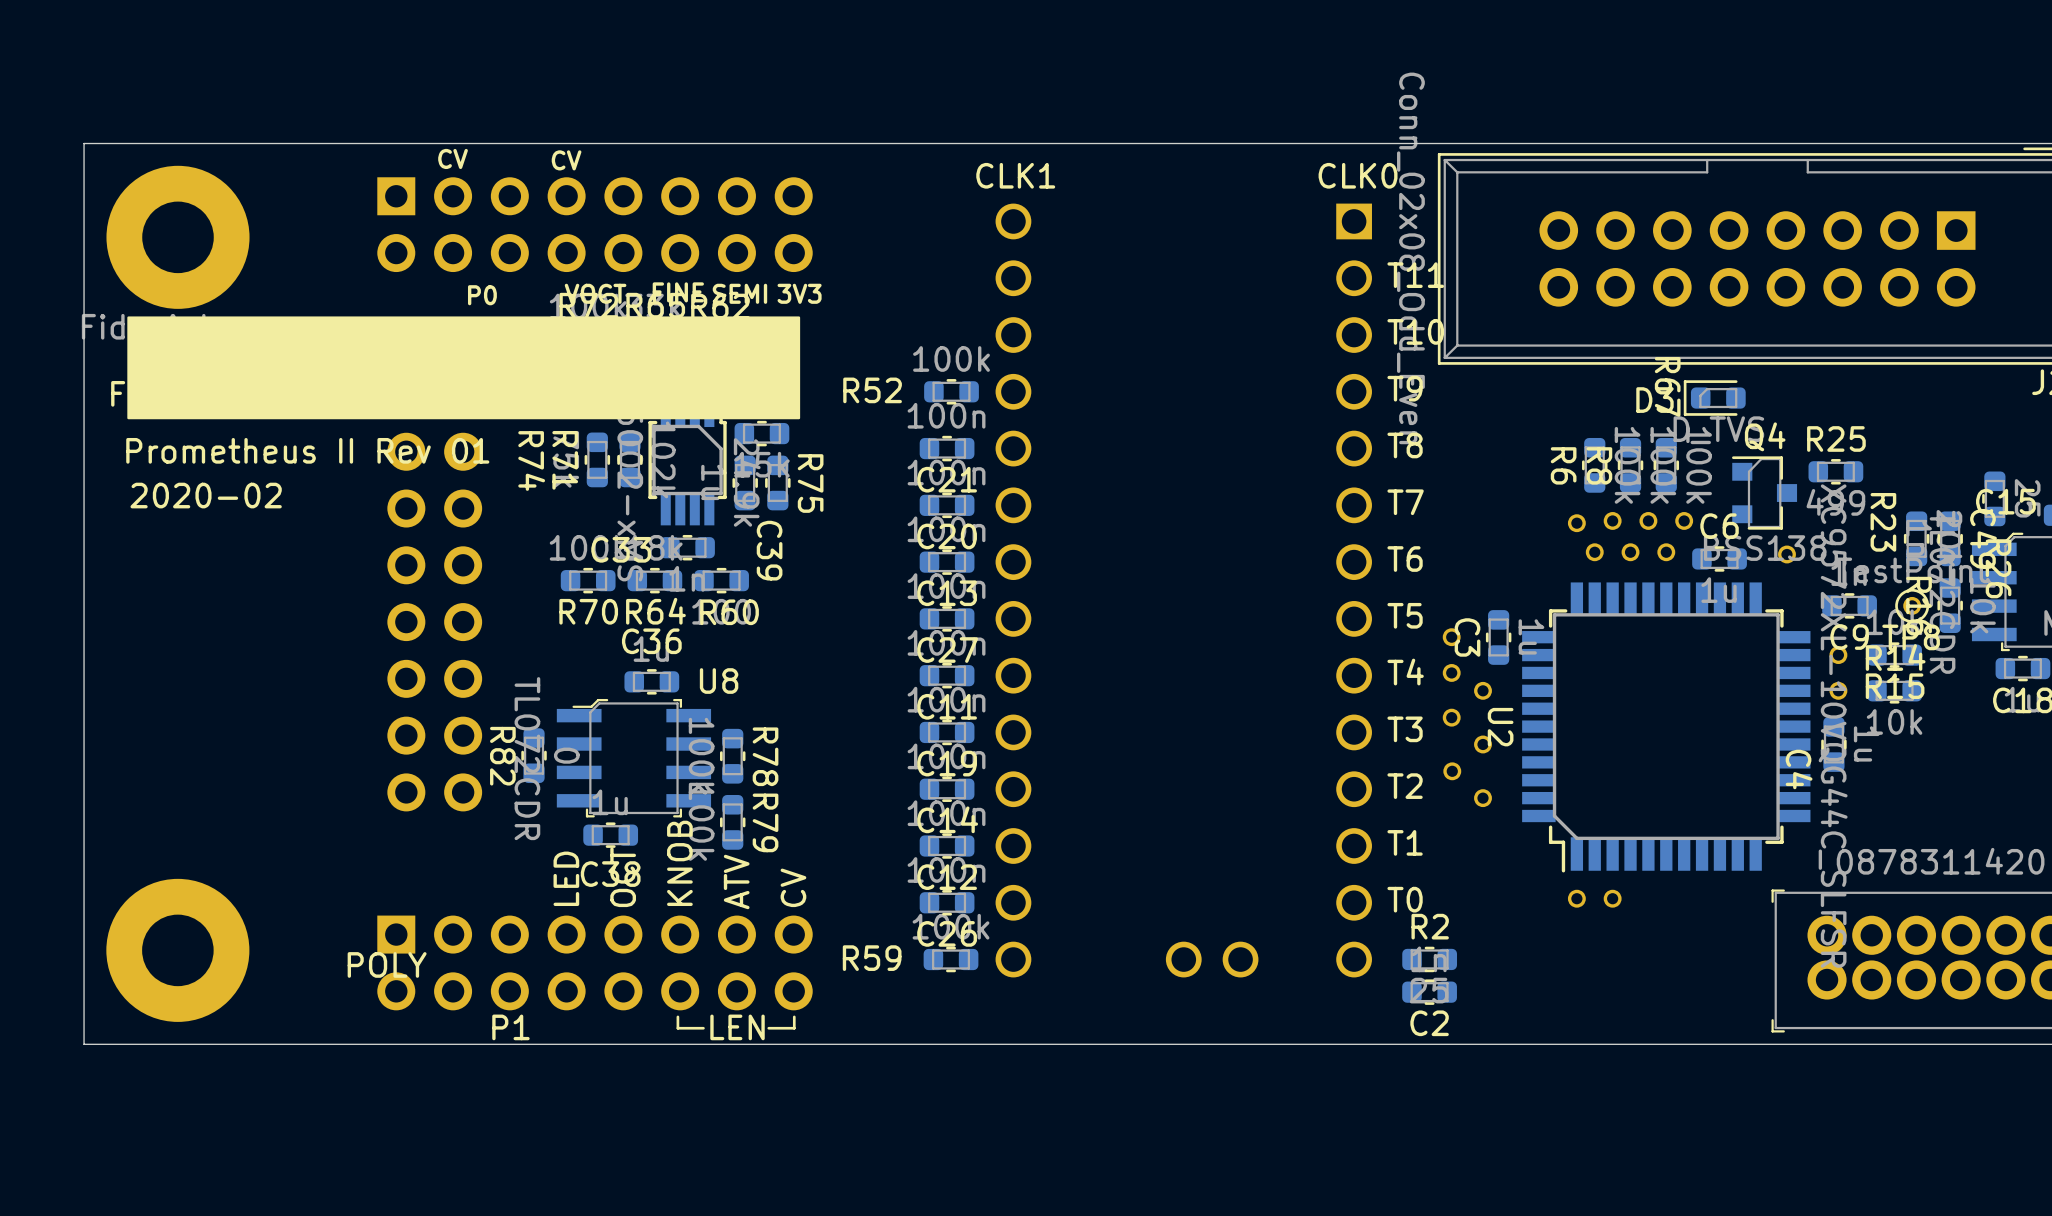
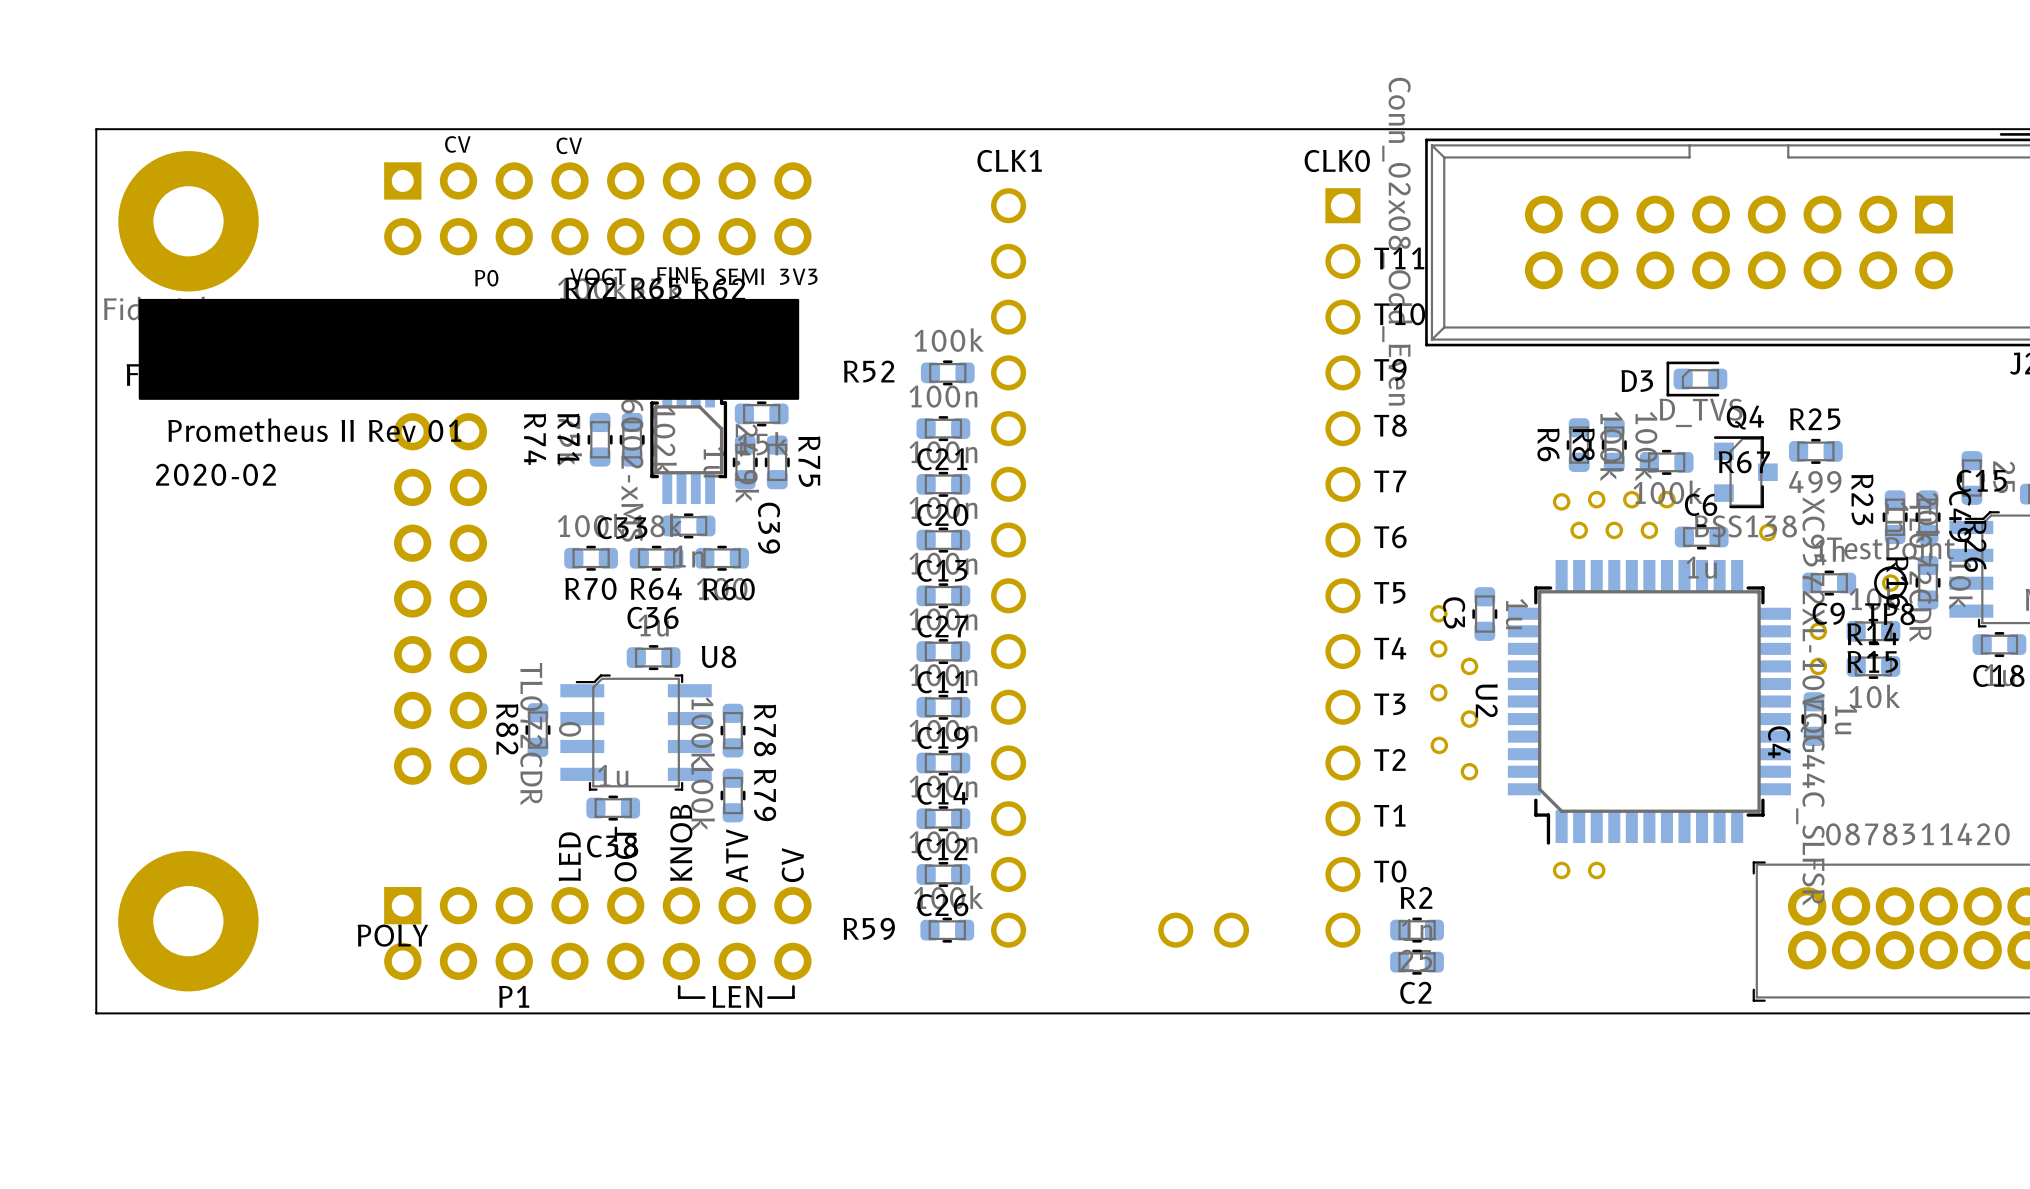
R67 rotation: 0° (1666, 465) -> 90° clockwise (1666, 462)

